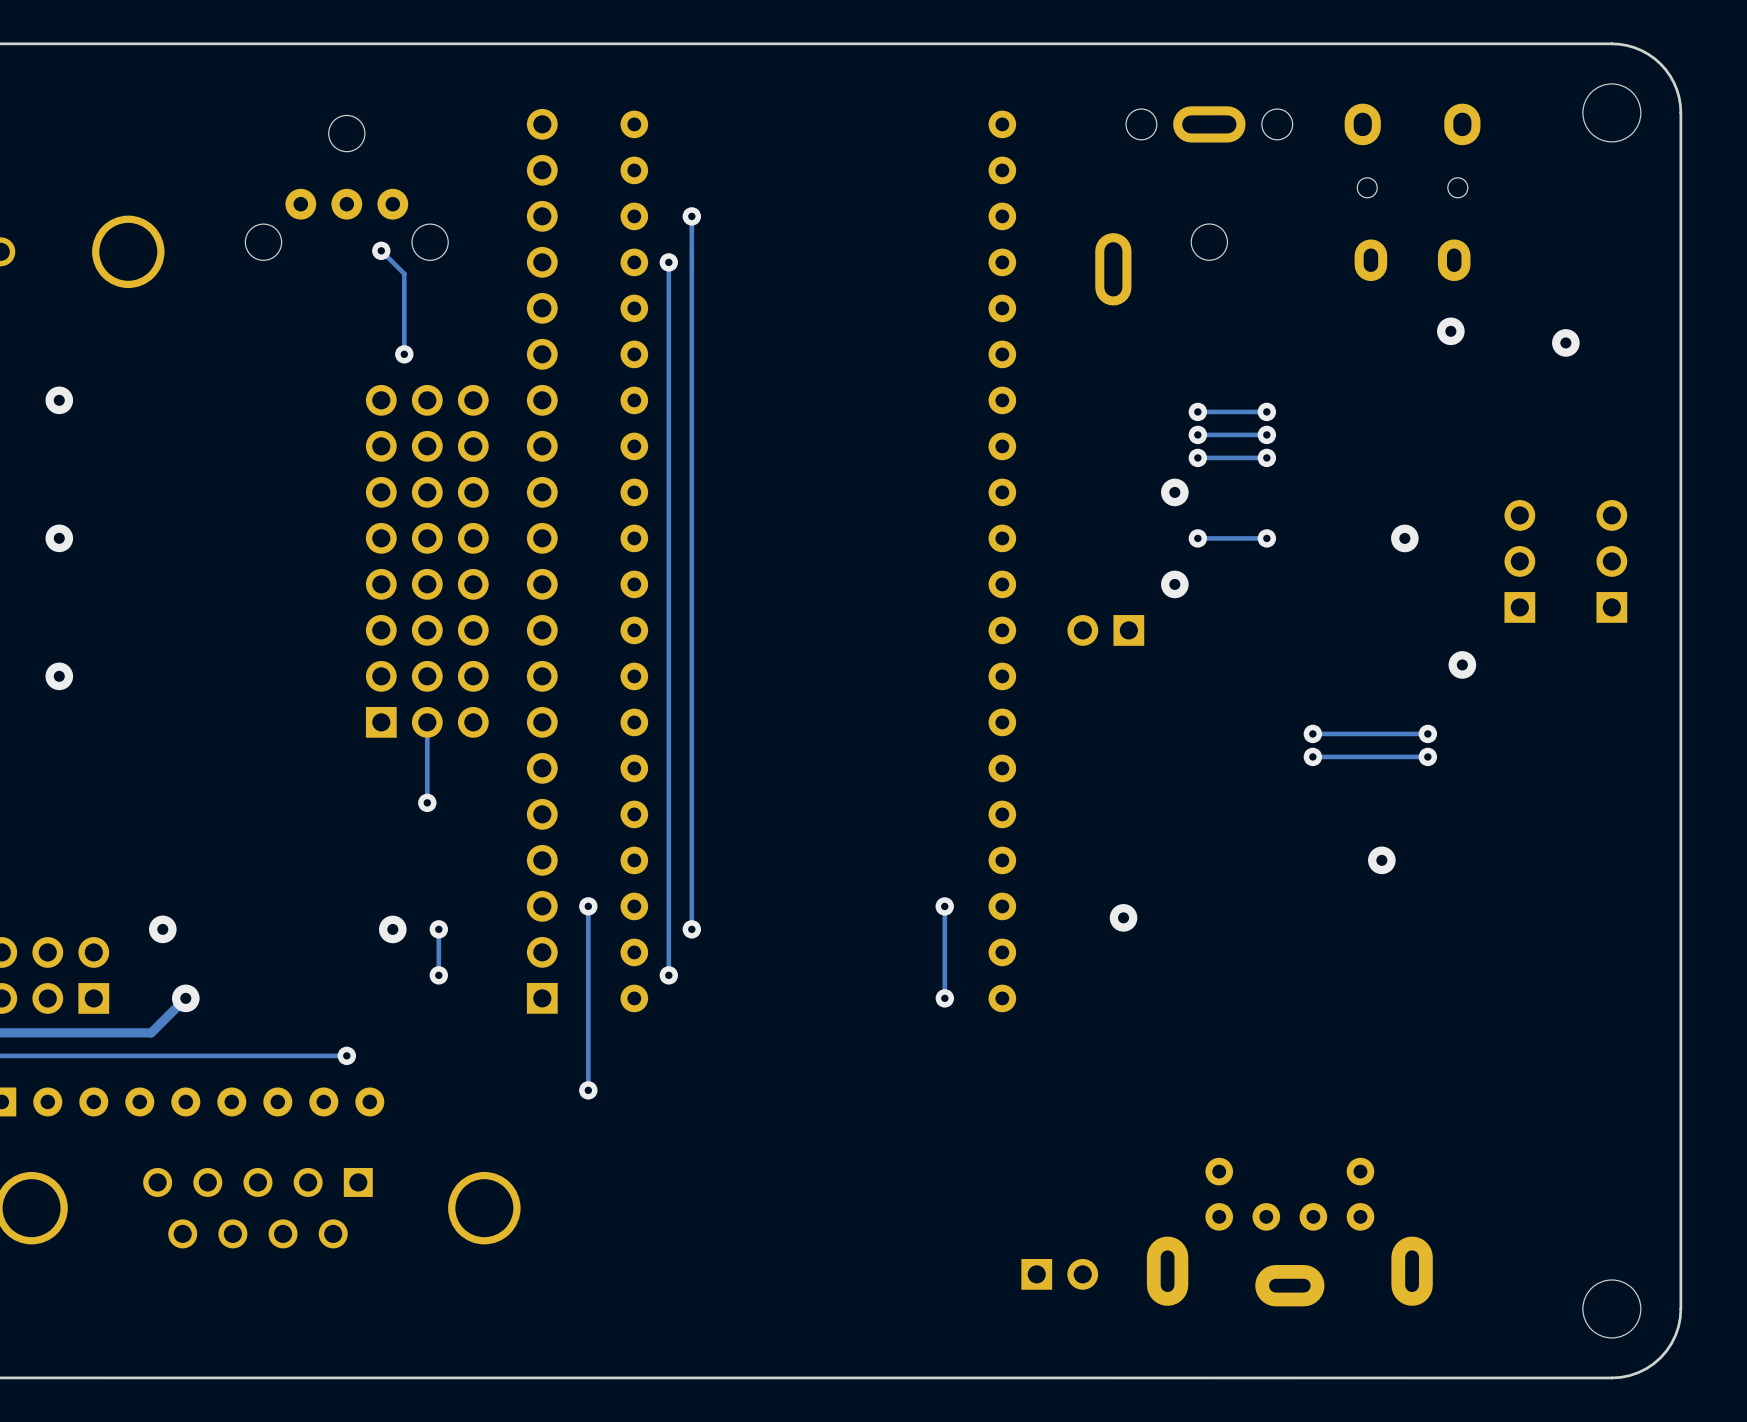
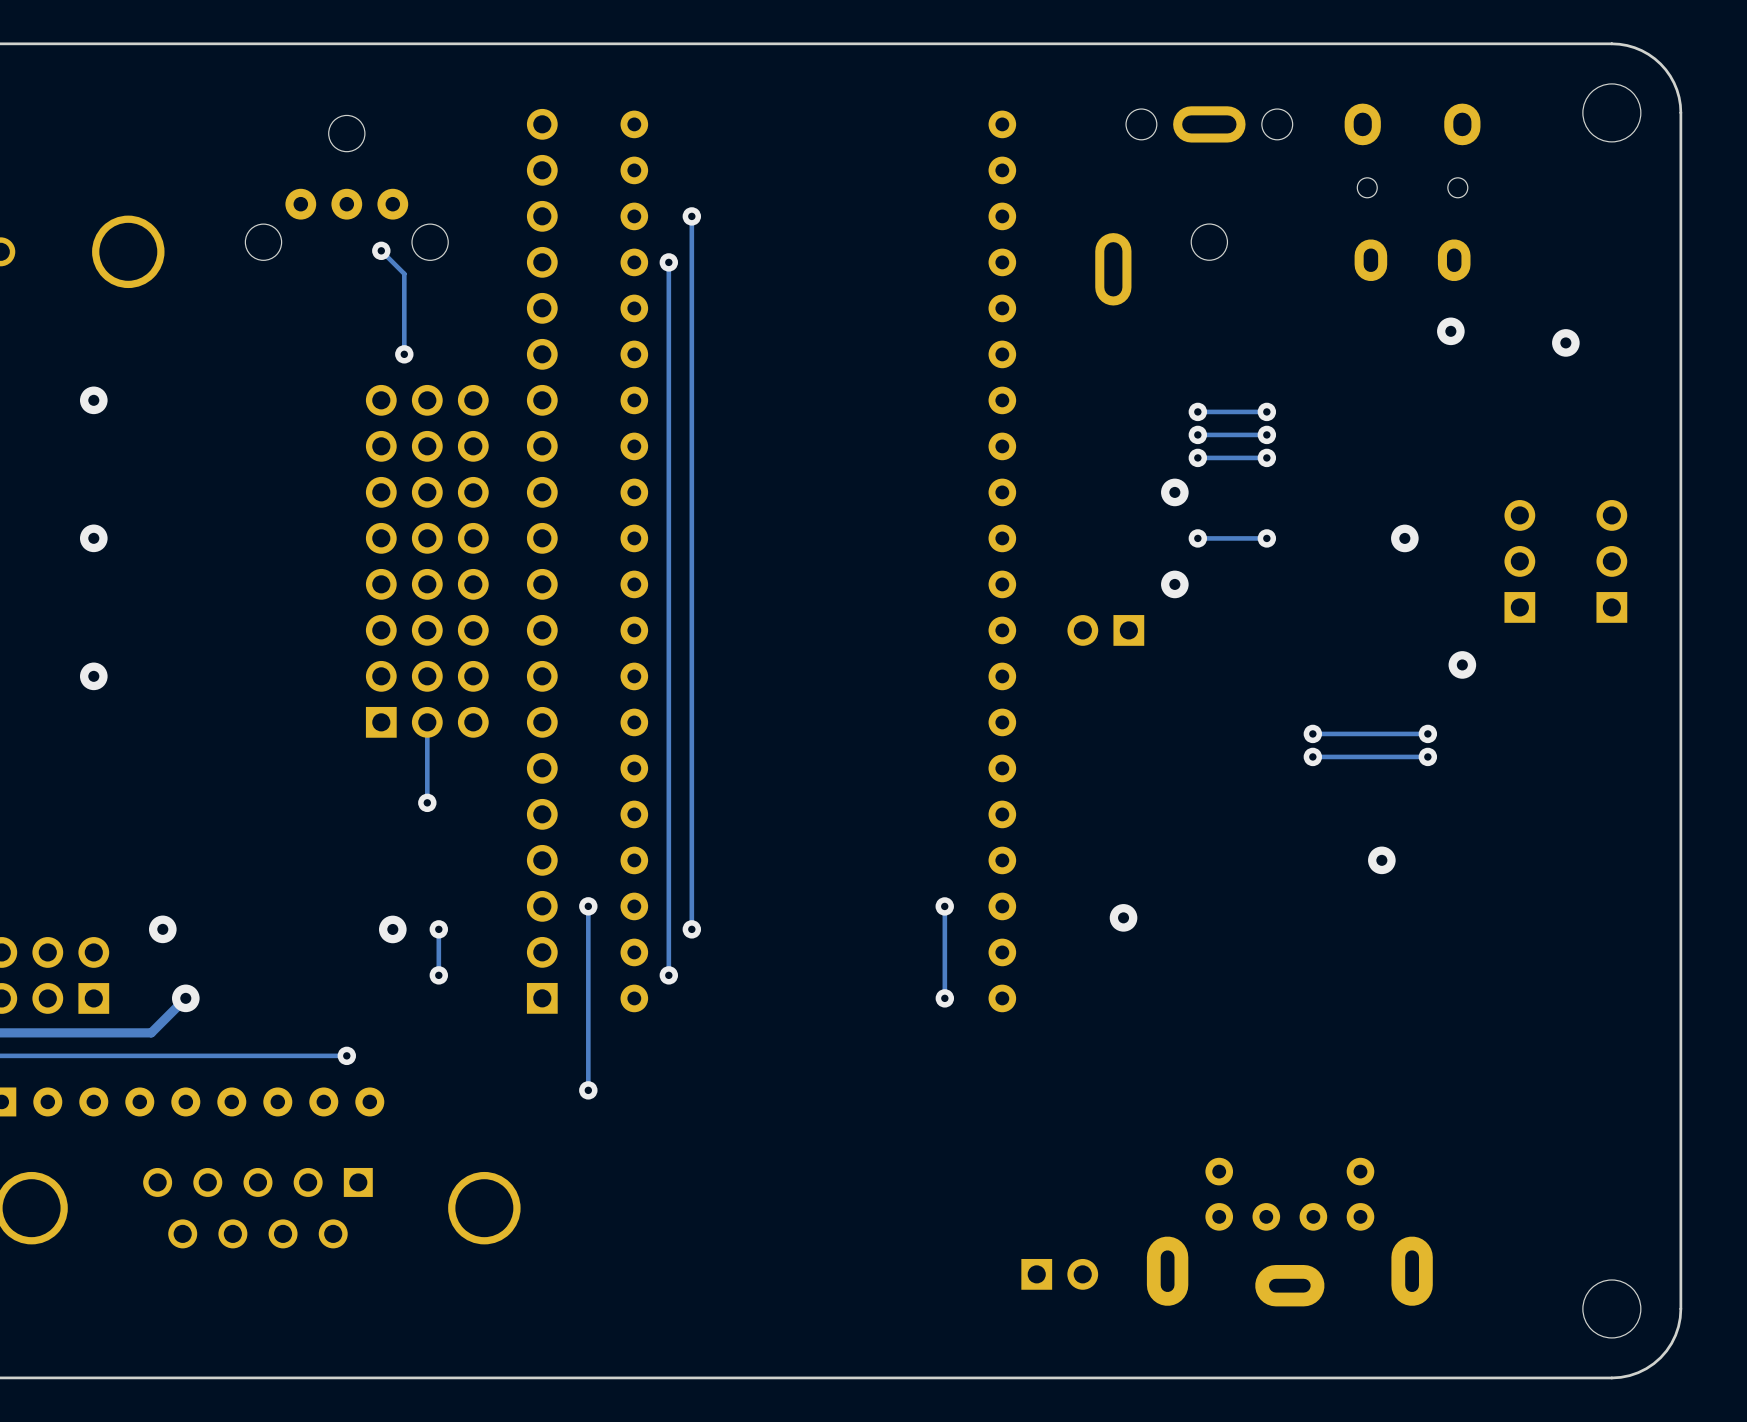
via position: (59, 400) -> (93, 400)
via position: (59, 538) -> (93, 538)
via position: (59, 676) -> (93, 676)

